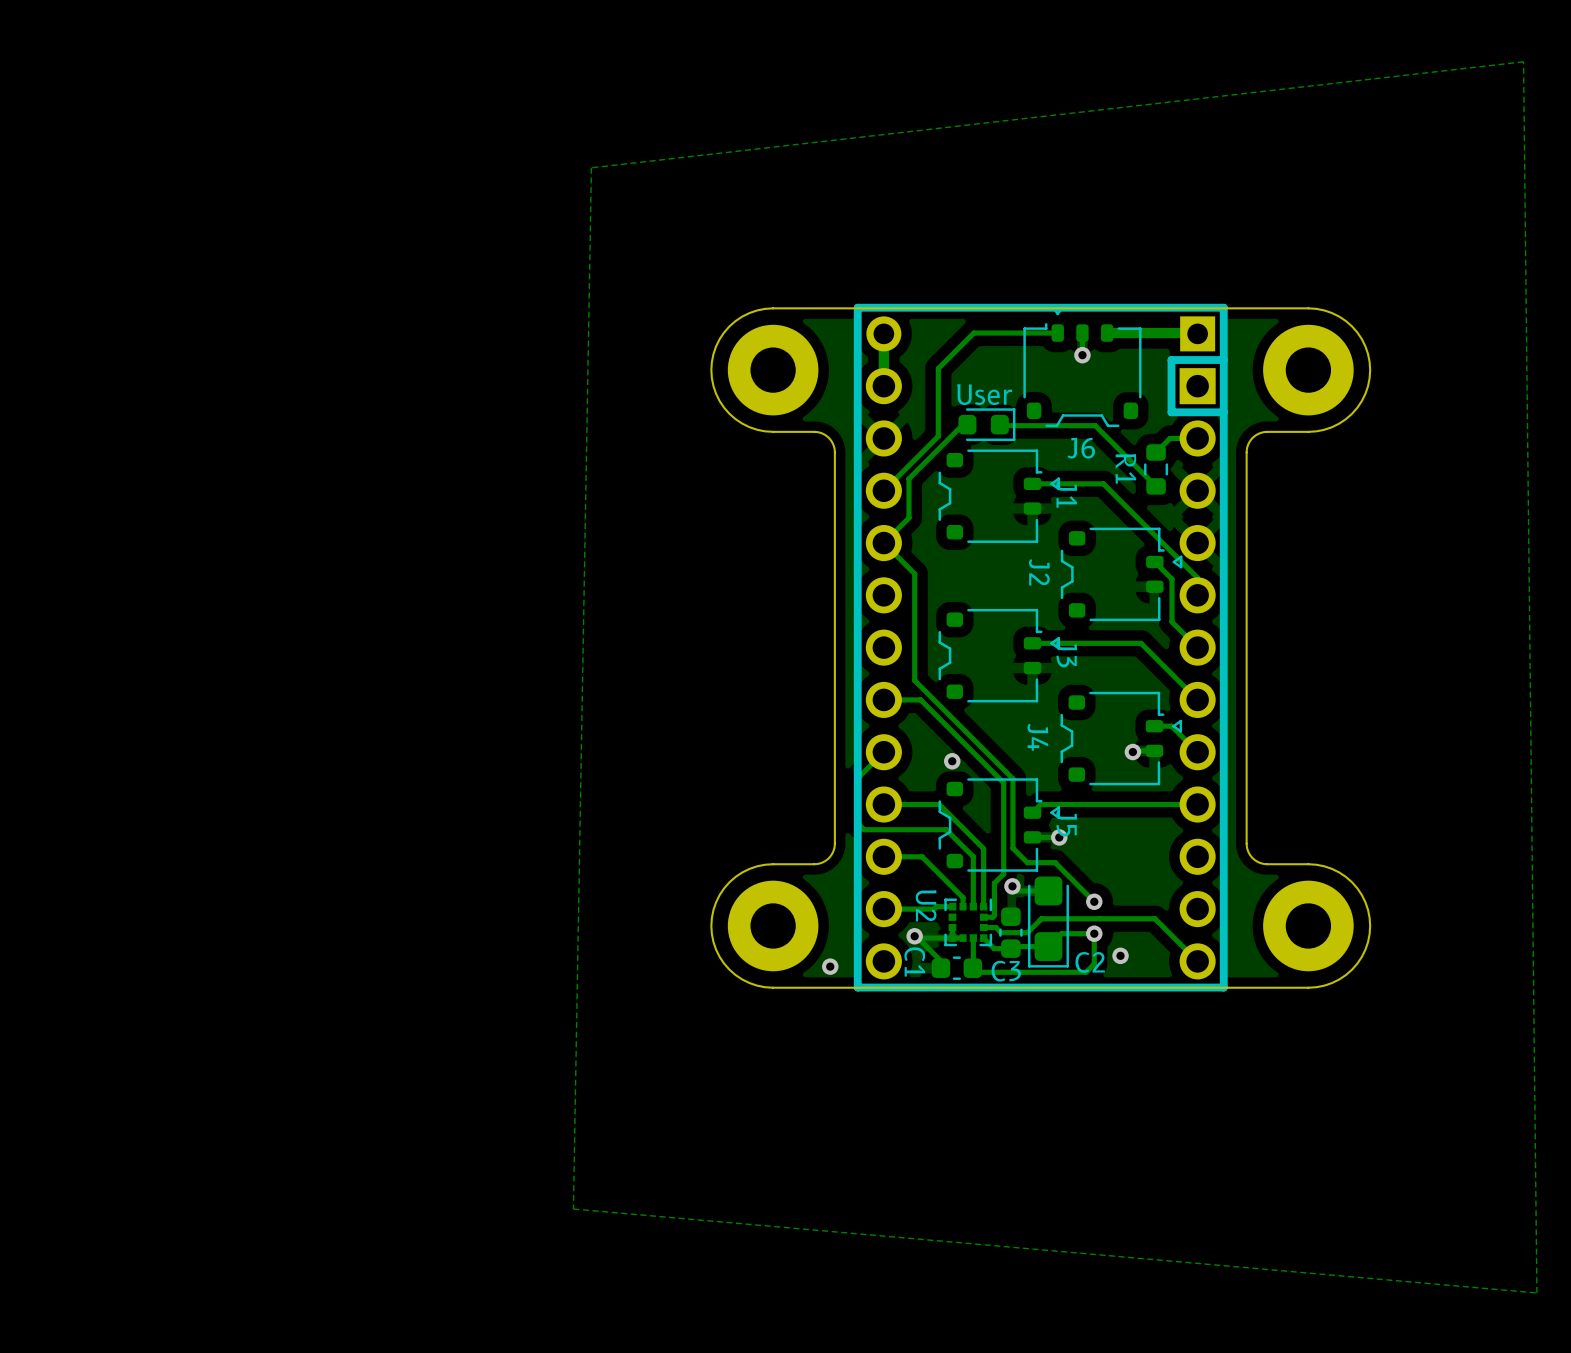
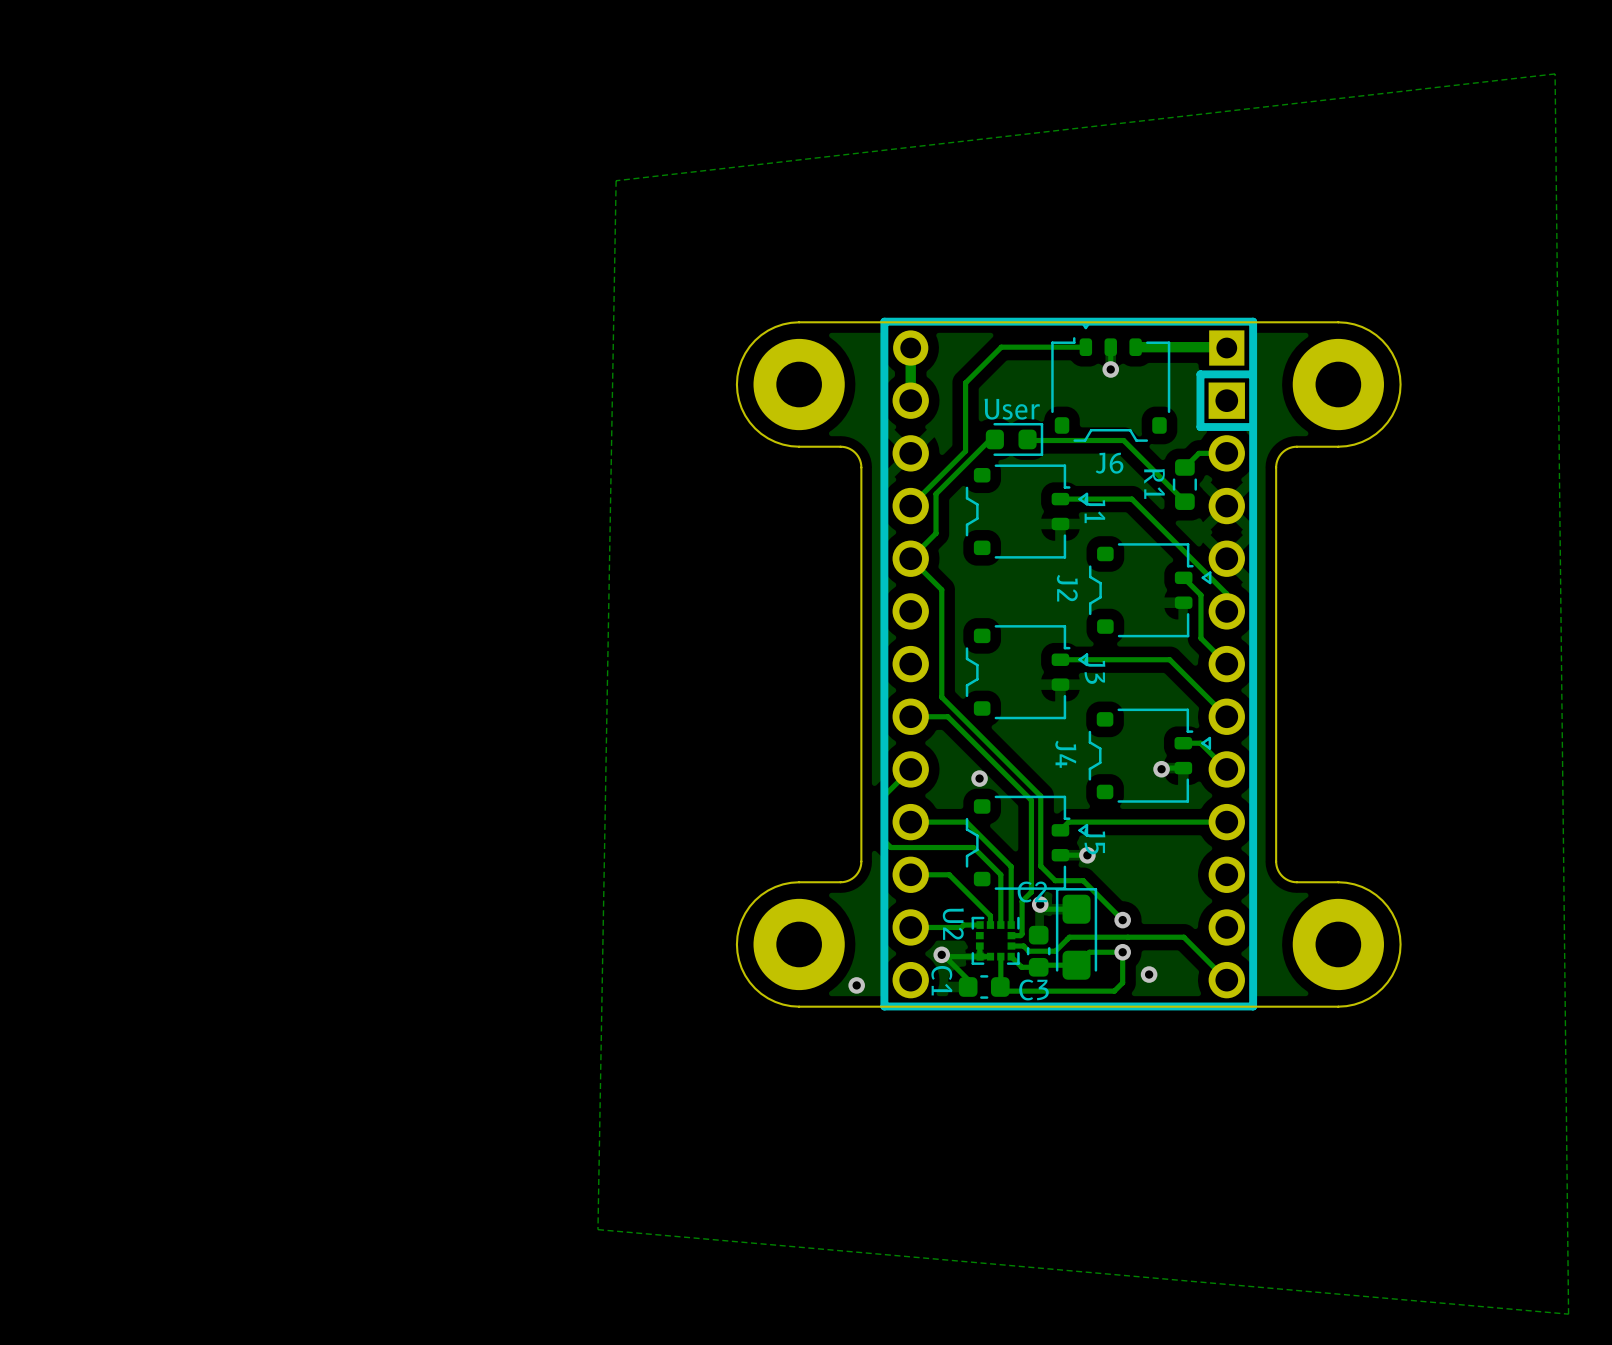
C2 rotation: 0° (1048, 922) -> 180° (1076, 933)

